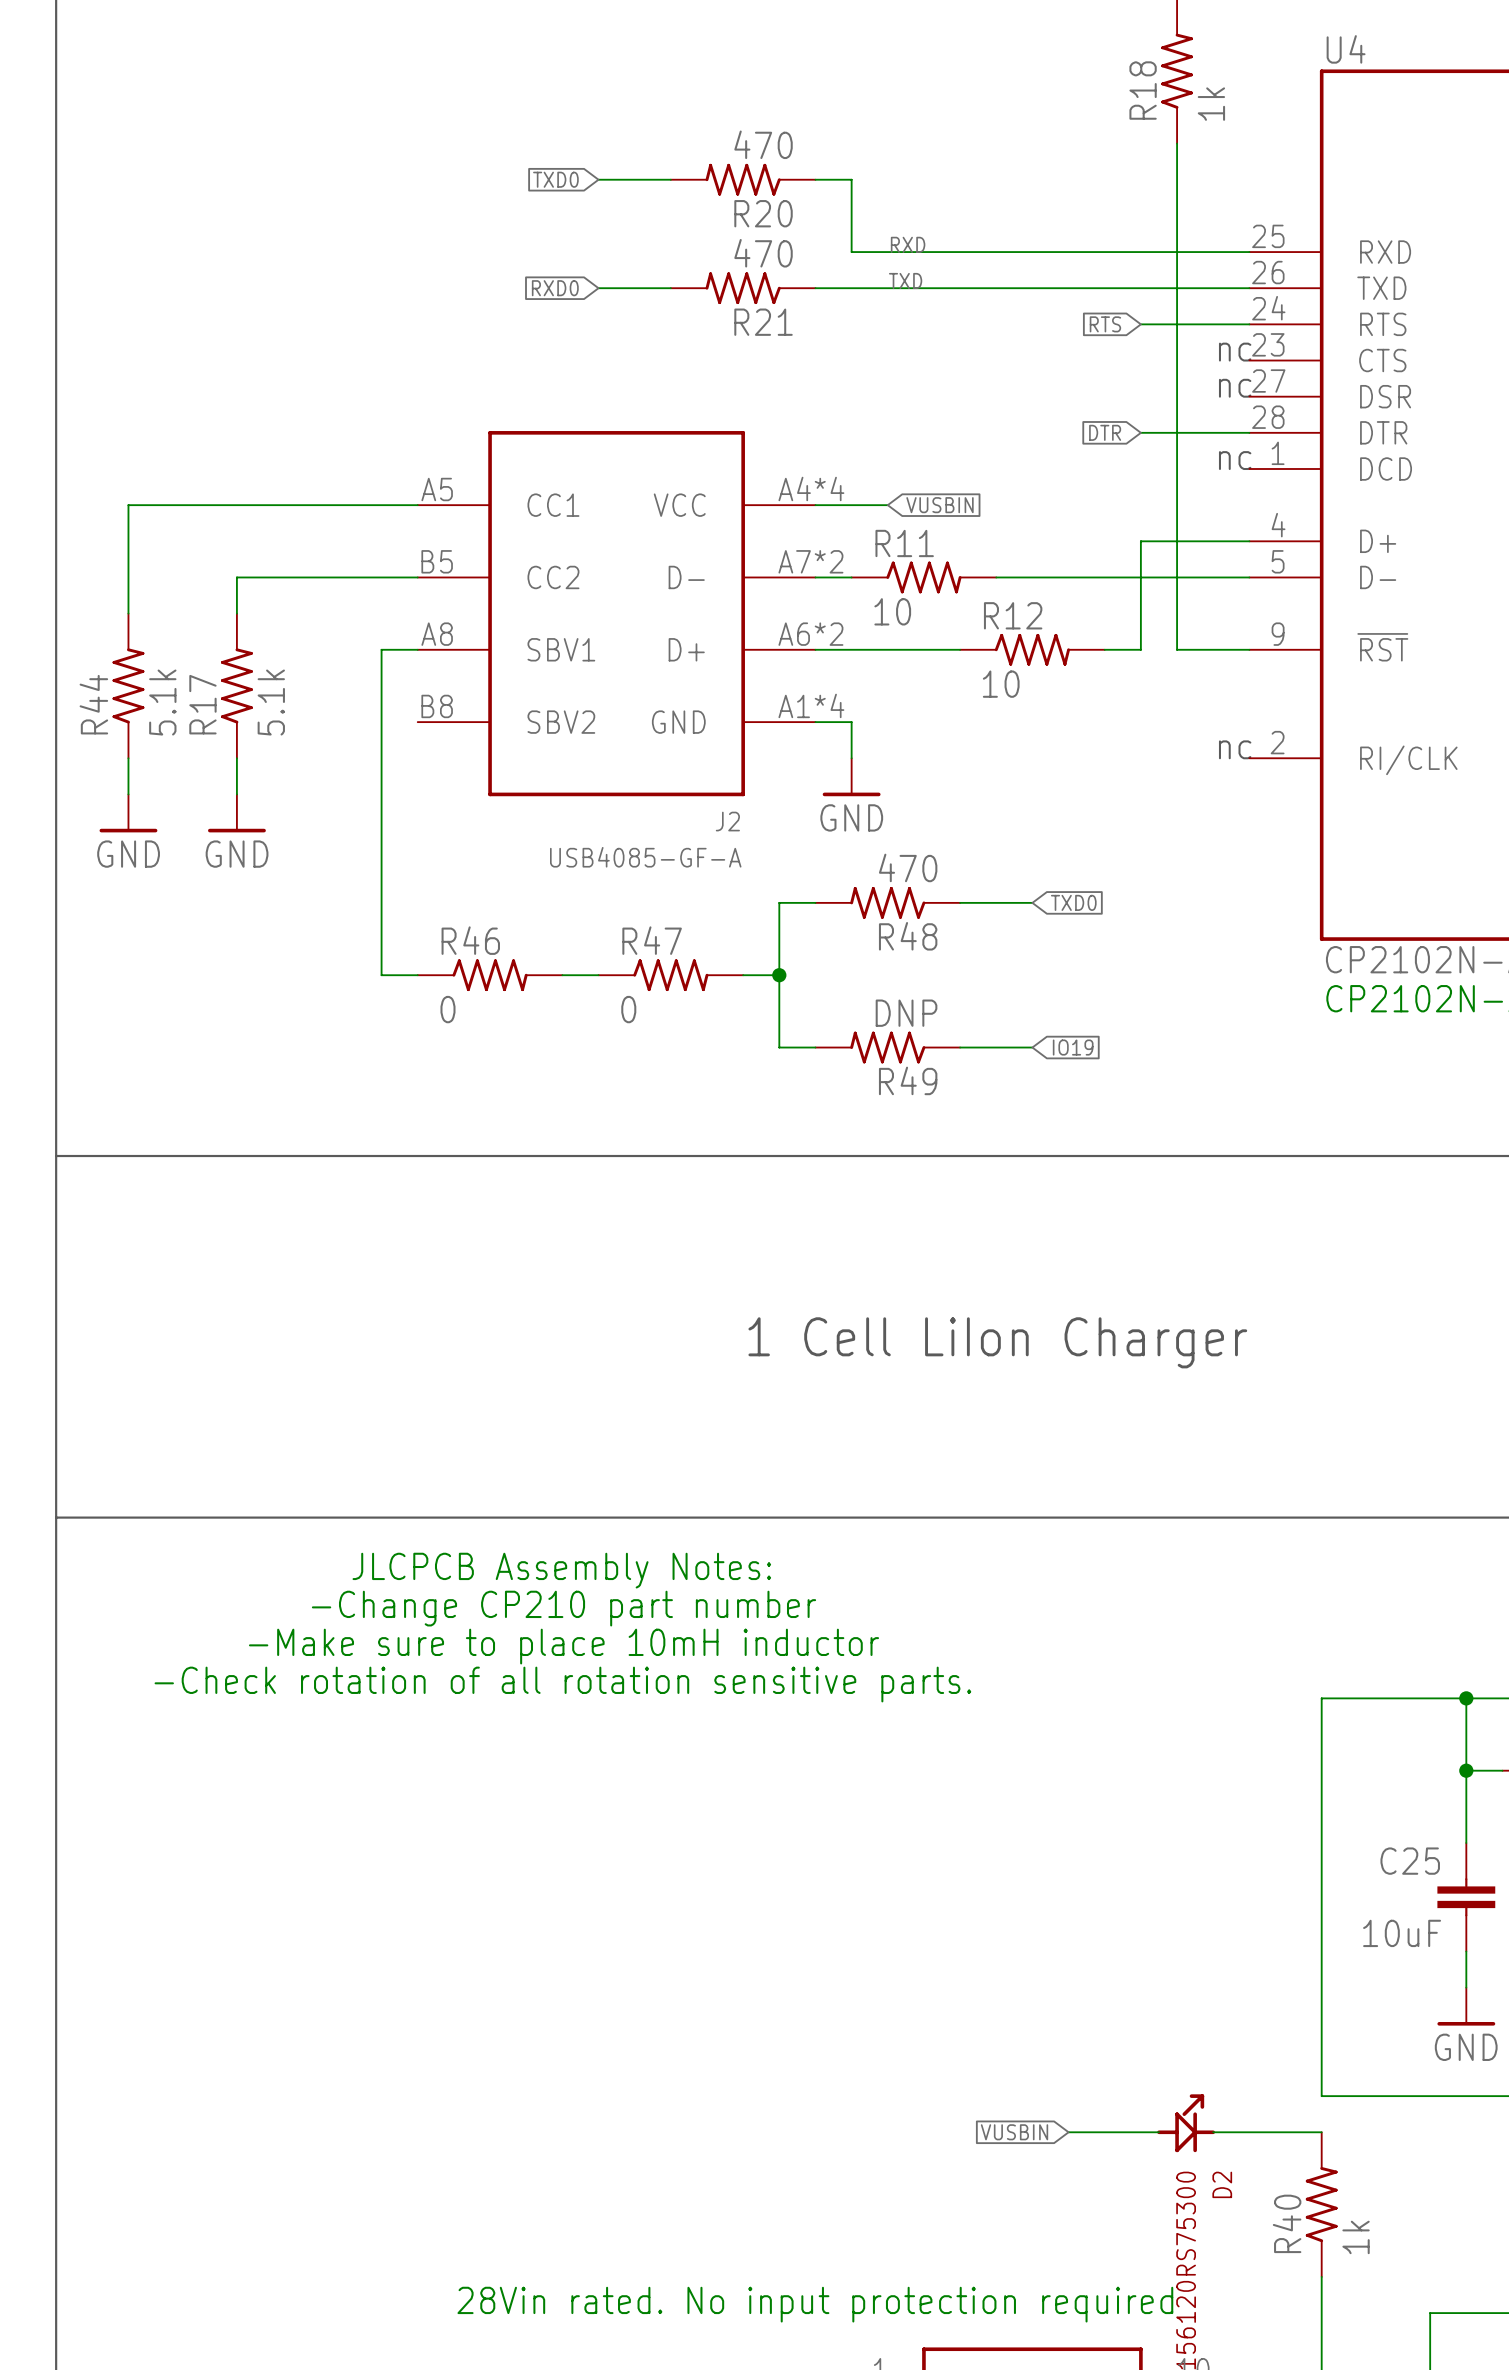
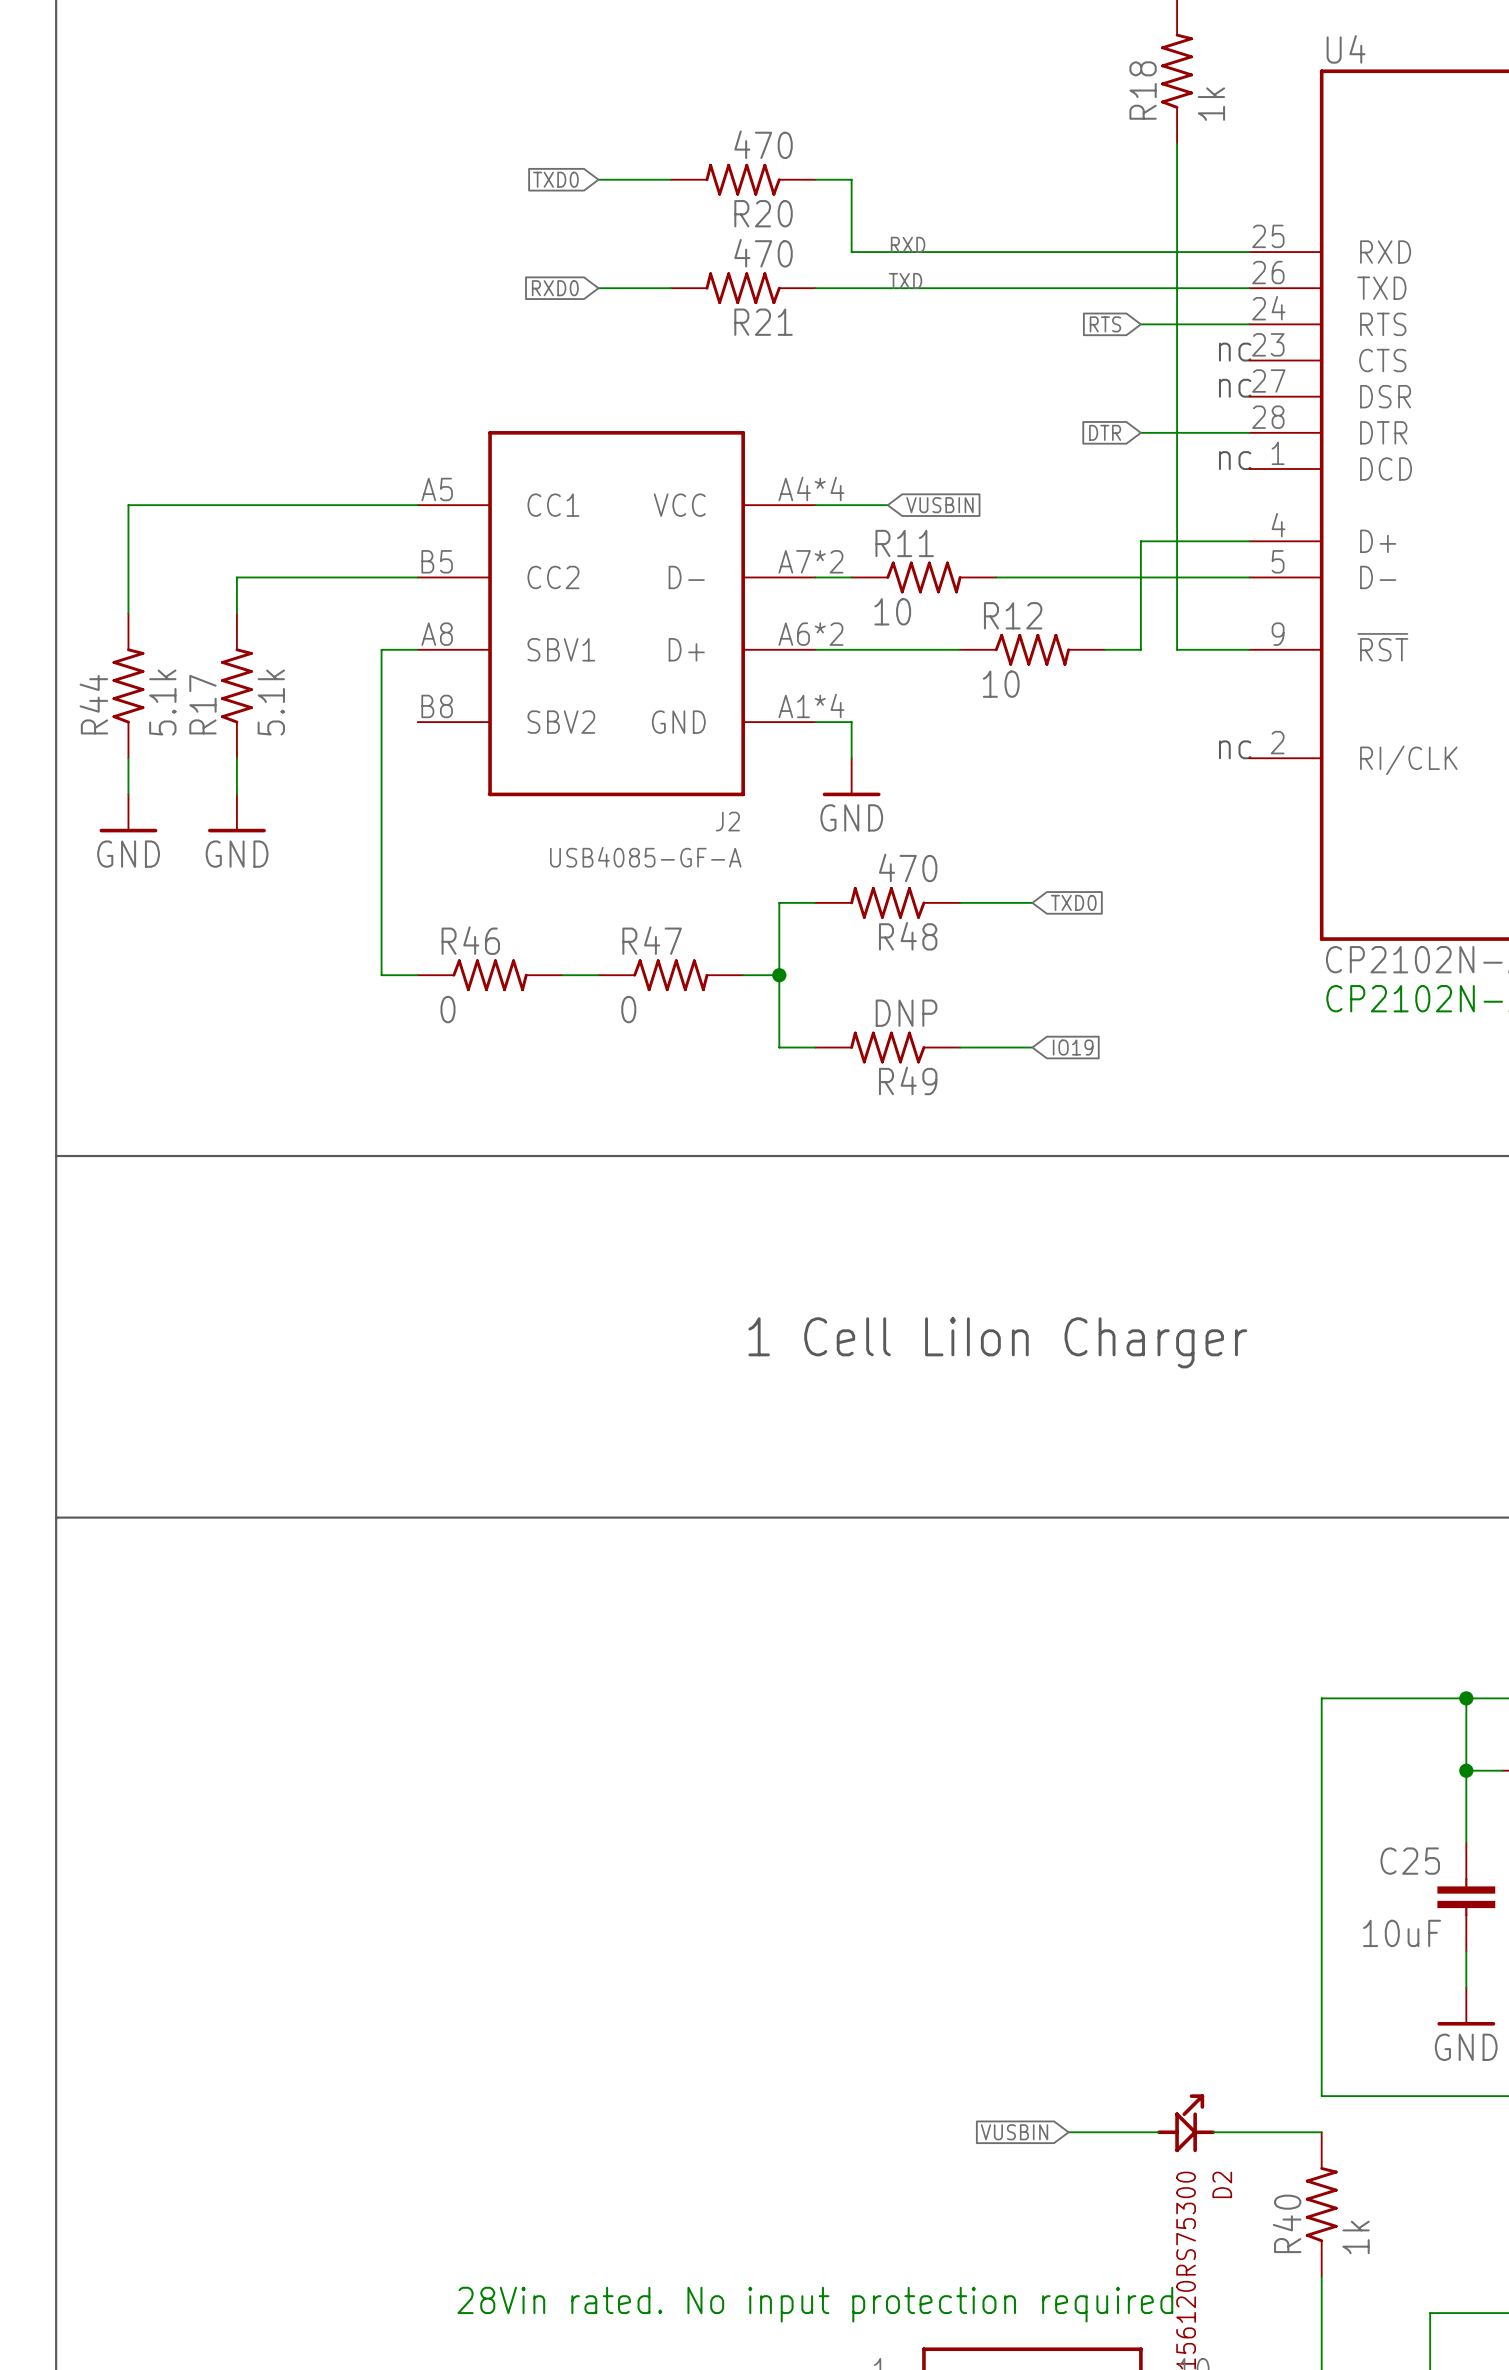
text: JLCPCB Assembly Notes: (561, 1570) -> none
text: -Change CP210 part number (563, 1608) -> none
text: -Make sure to place 10mH inductor (563, 1646) -> none
text: -Check rotation of all rotation sensitive parts. (562, 1684) -> none

